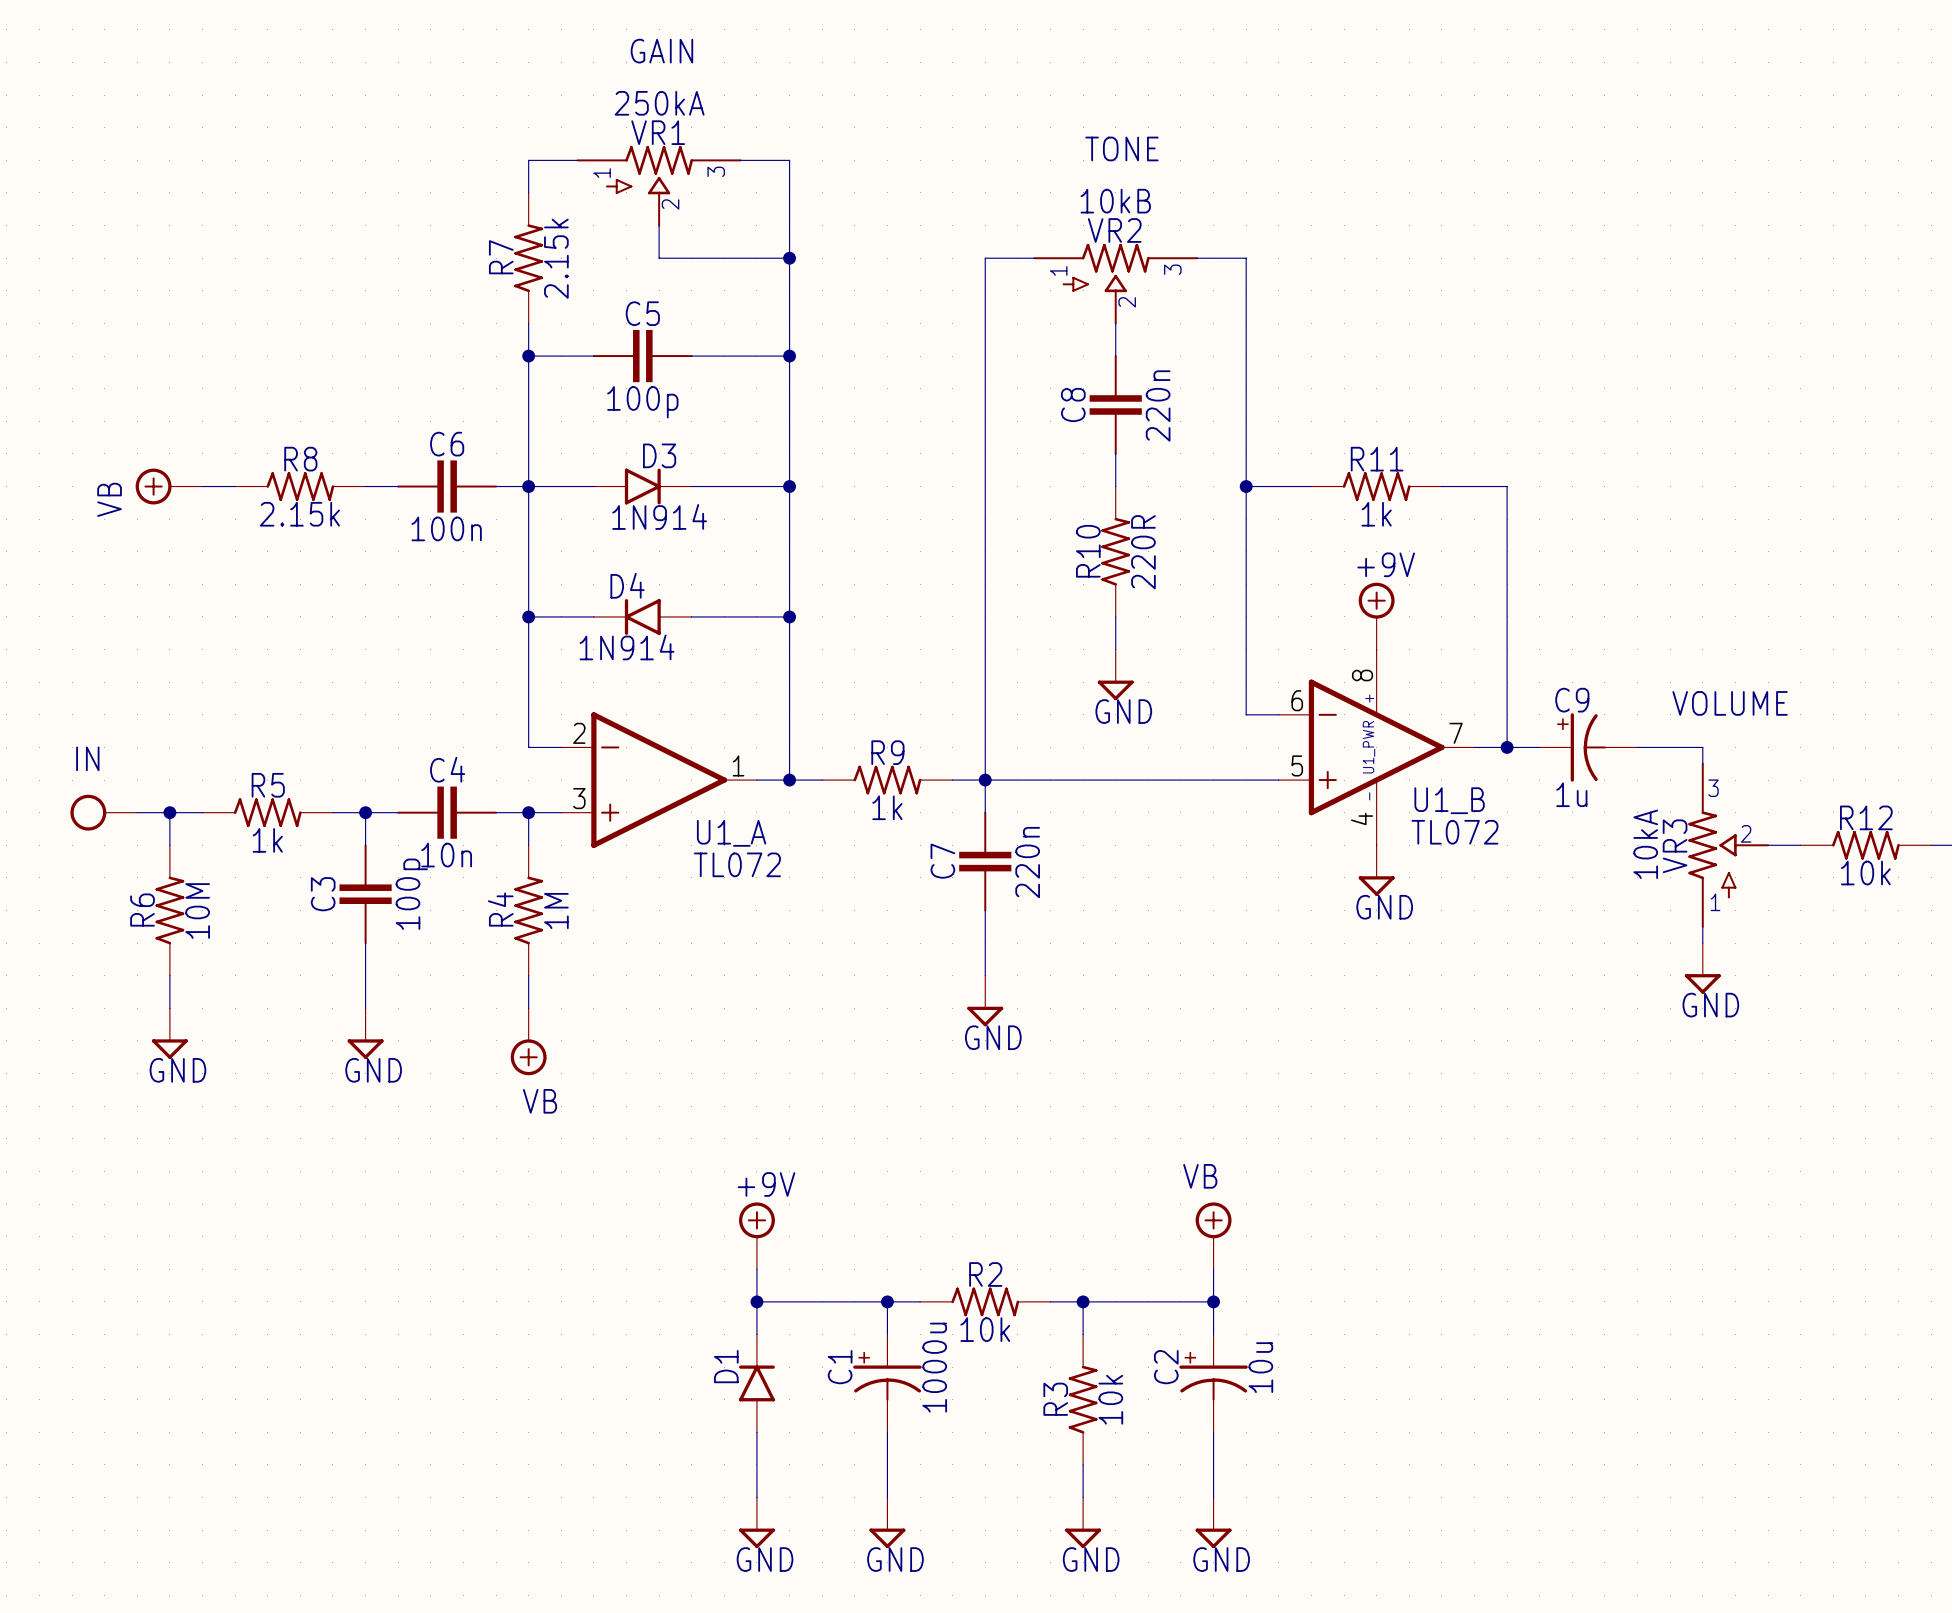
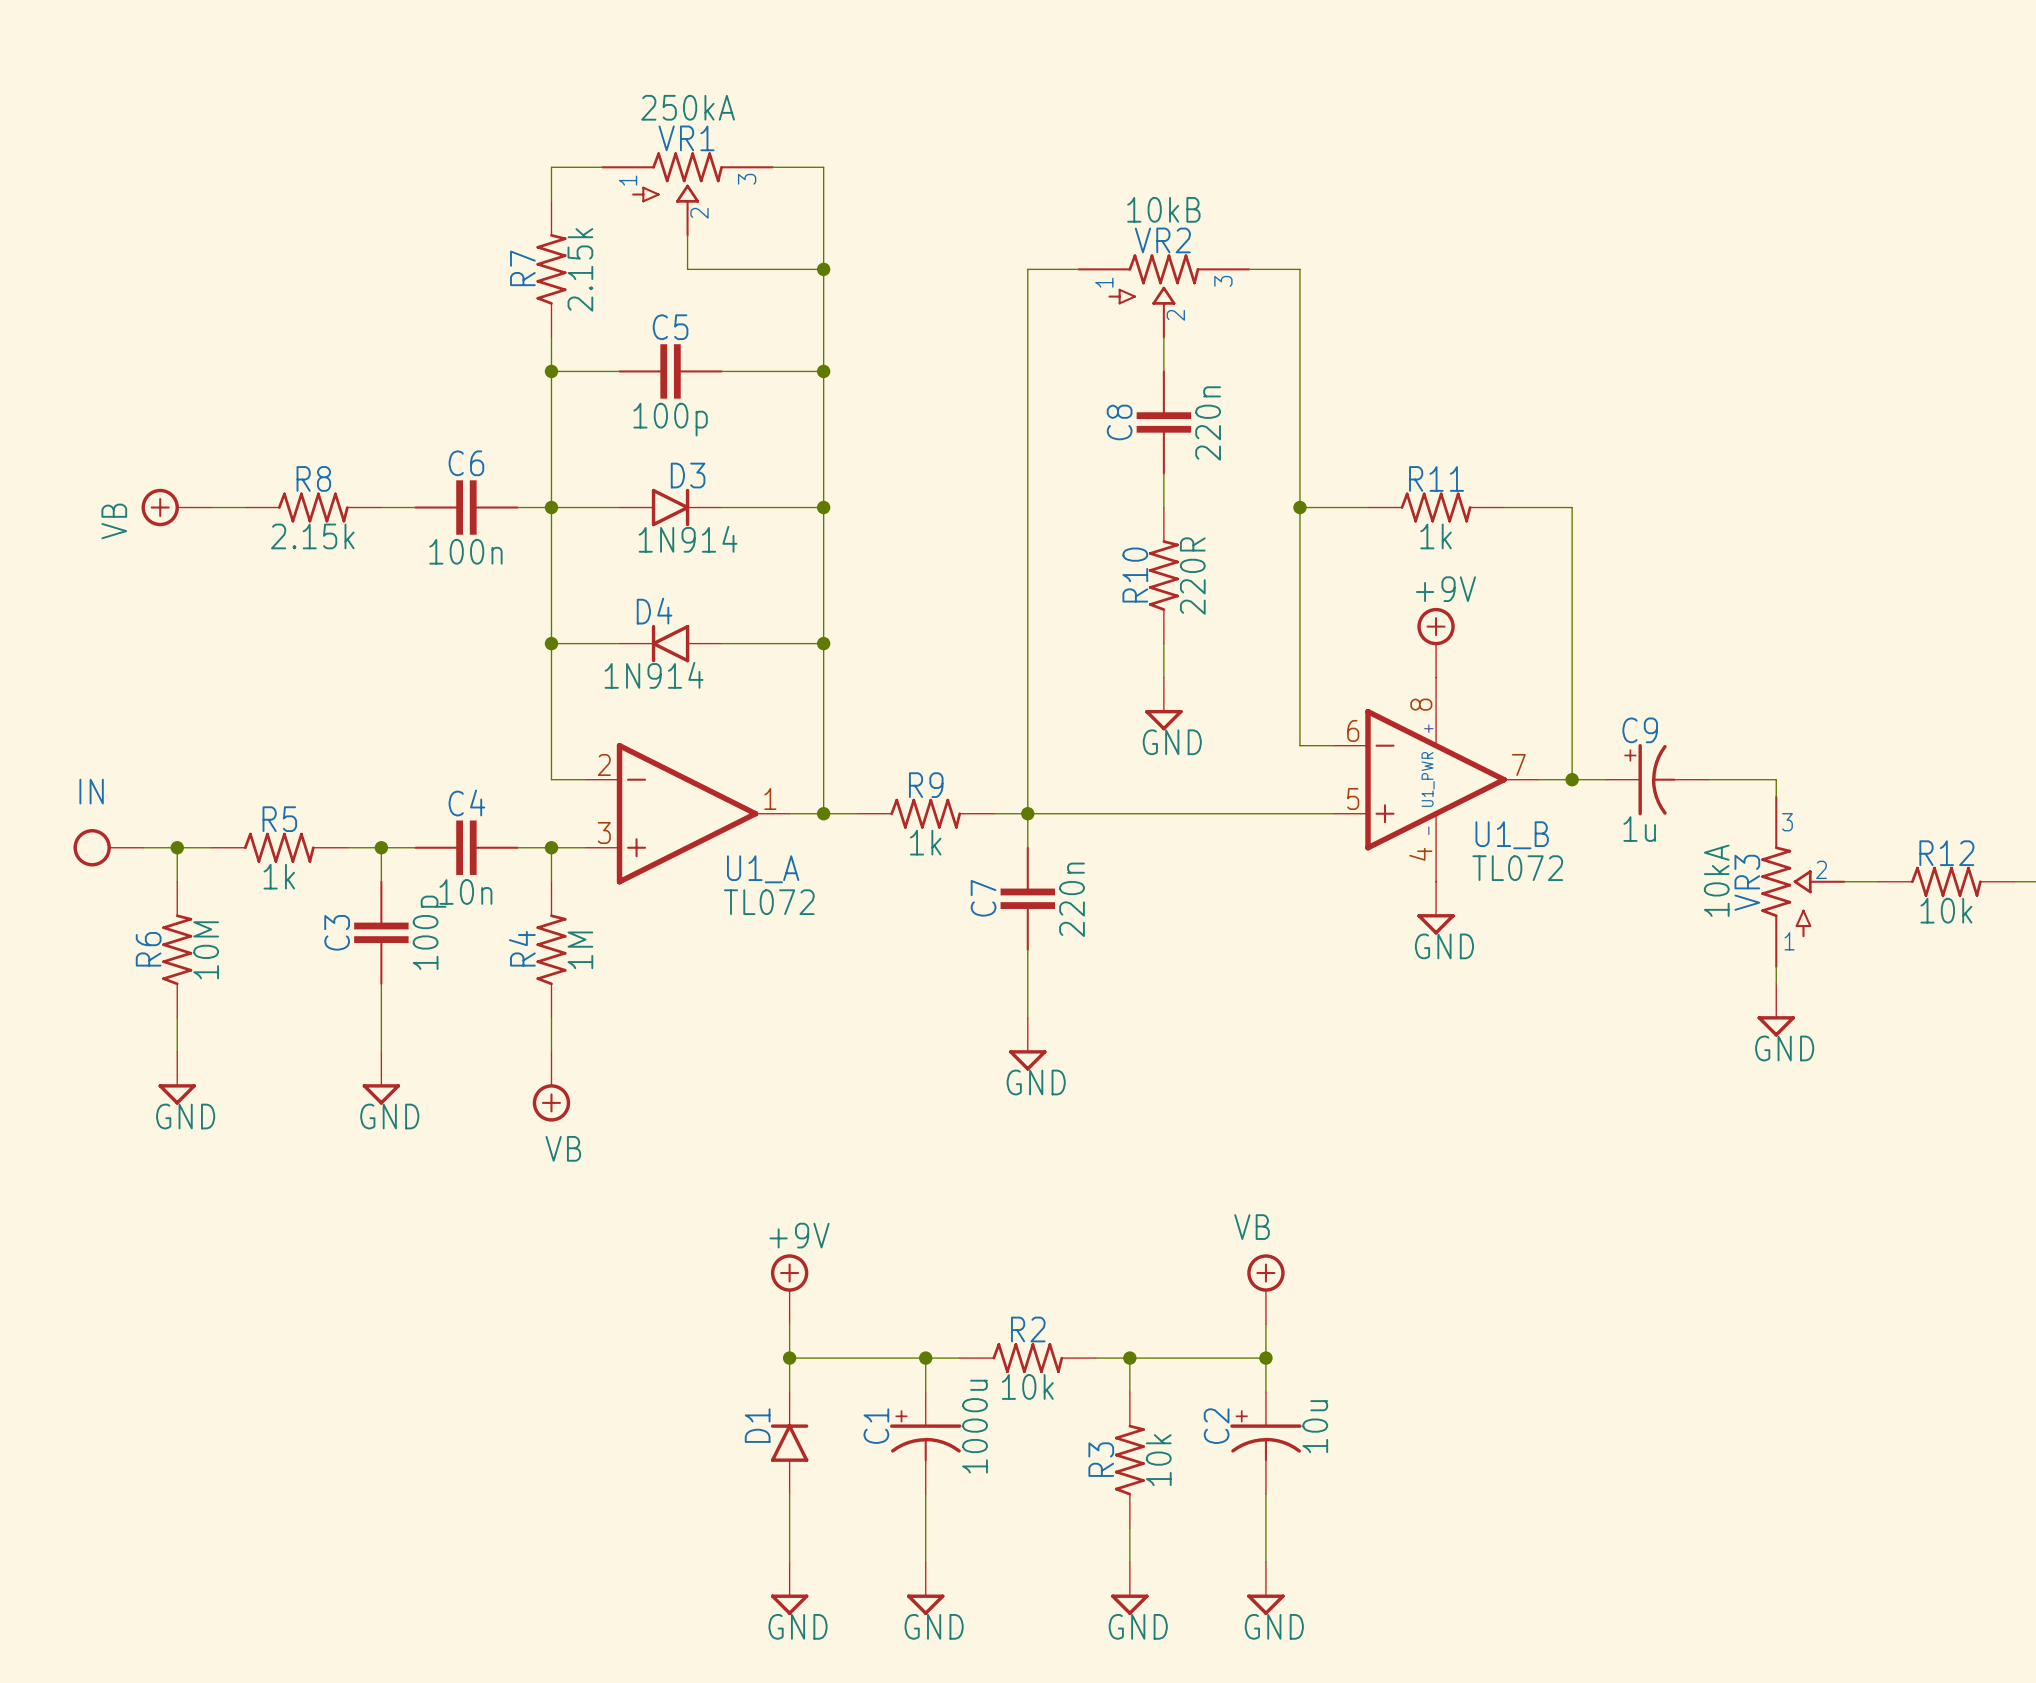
text: GAIN (661, 51) -> none
text: TONE (1121, 148) -> none
text: VOLUME (1730, 703) -> none

